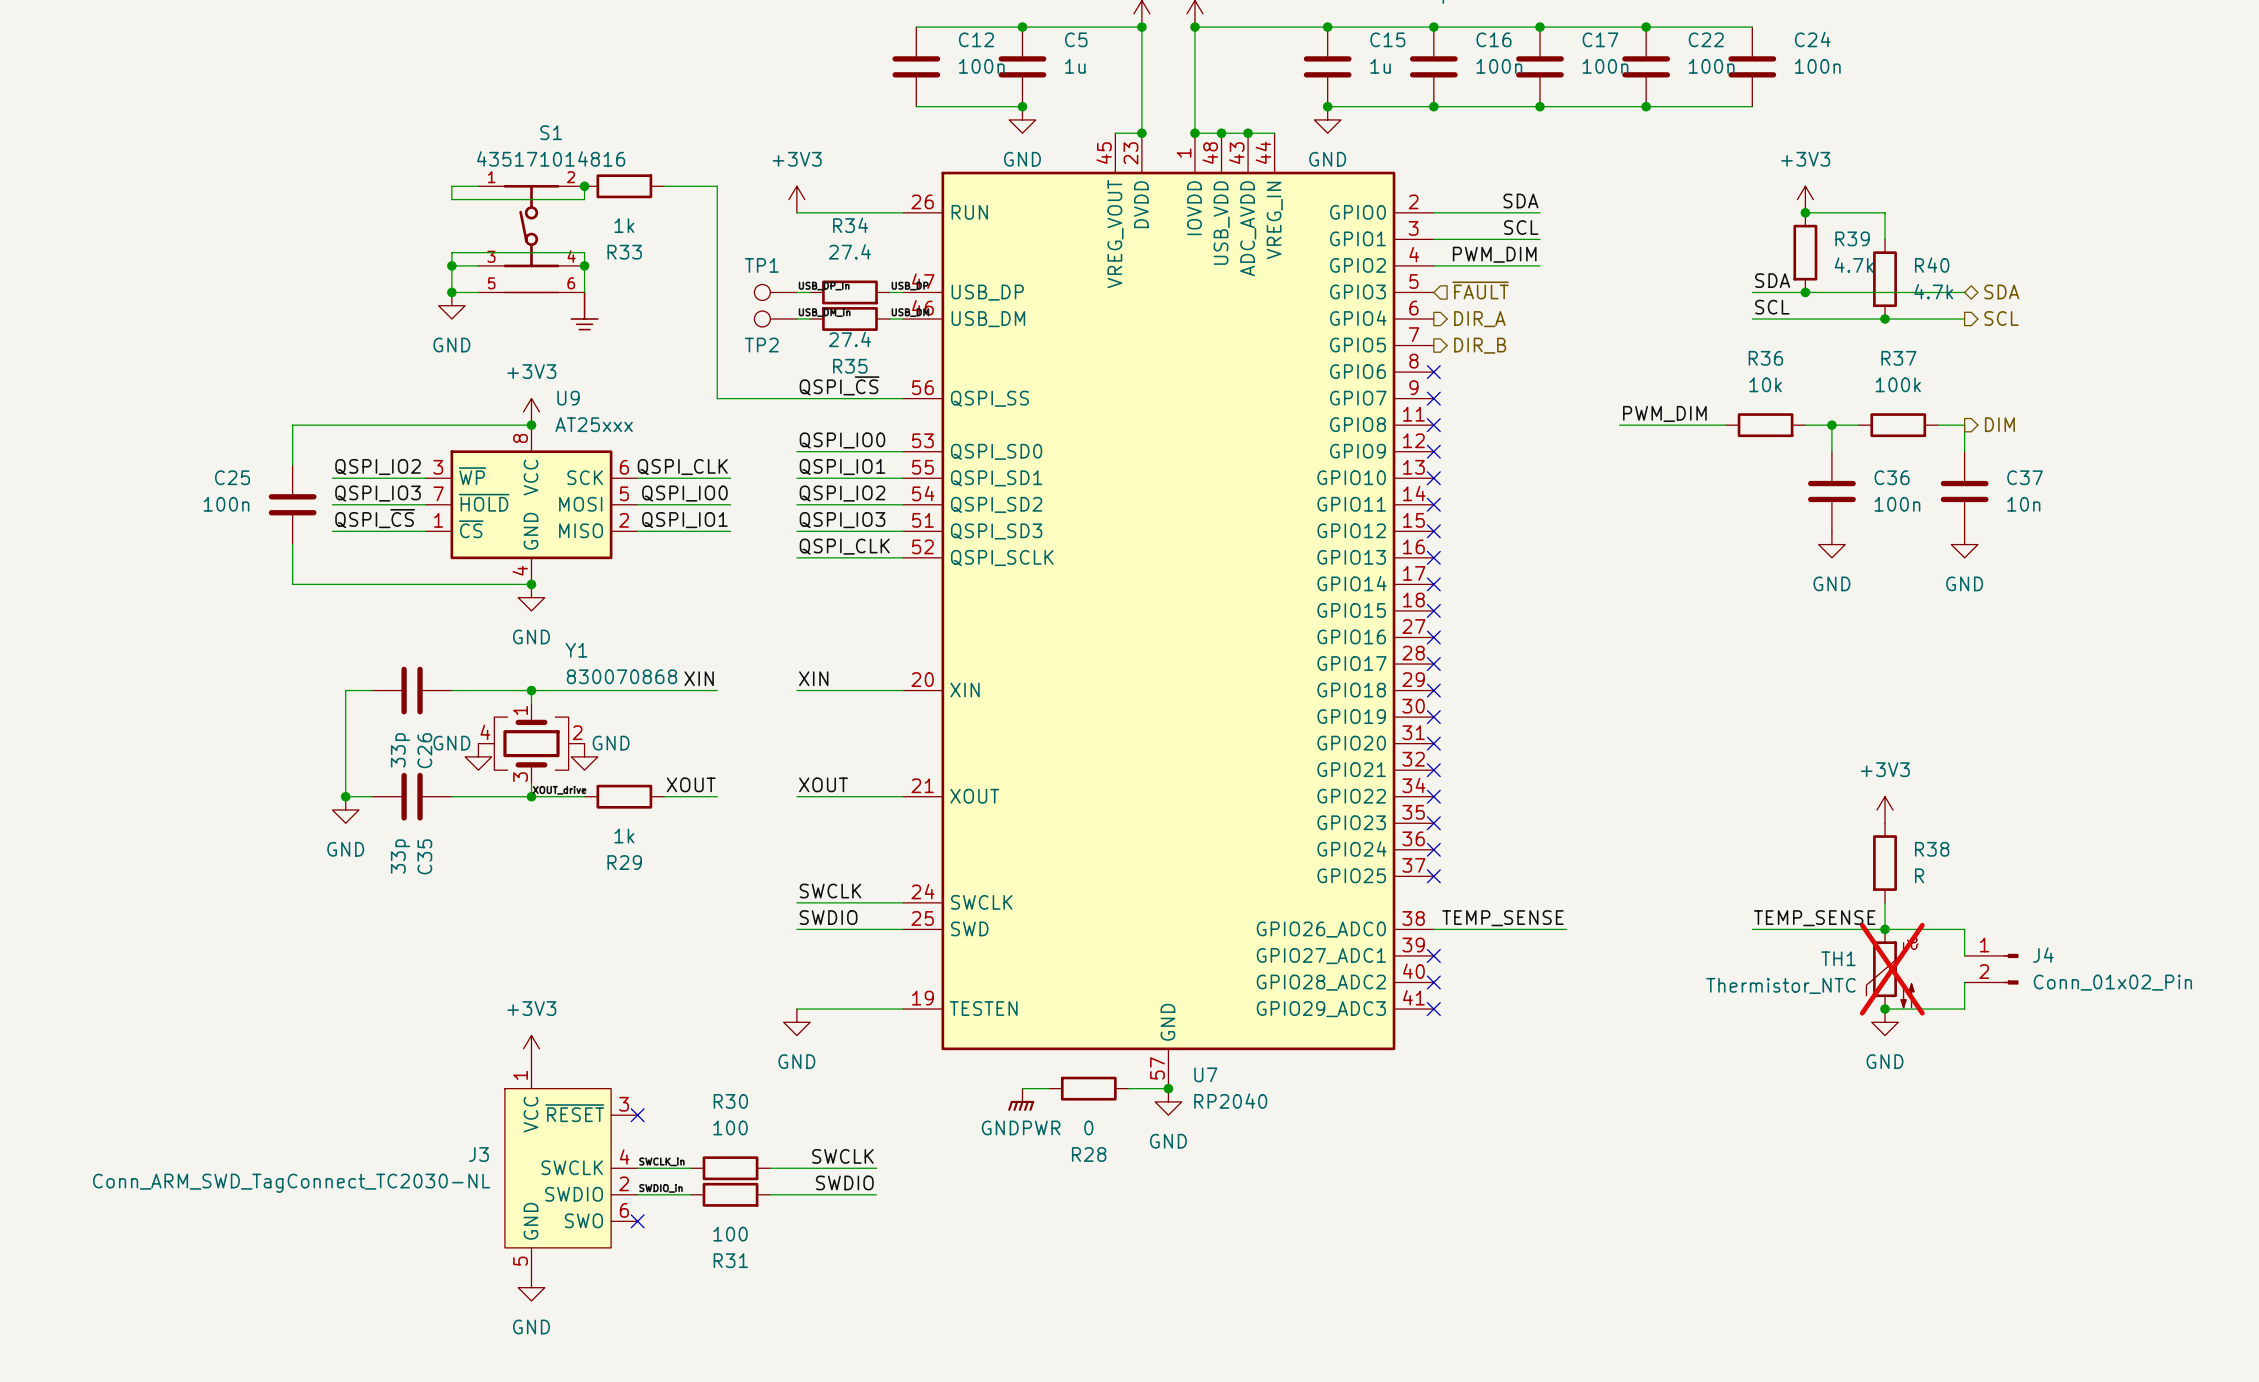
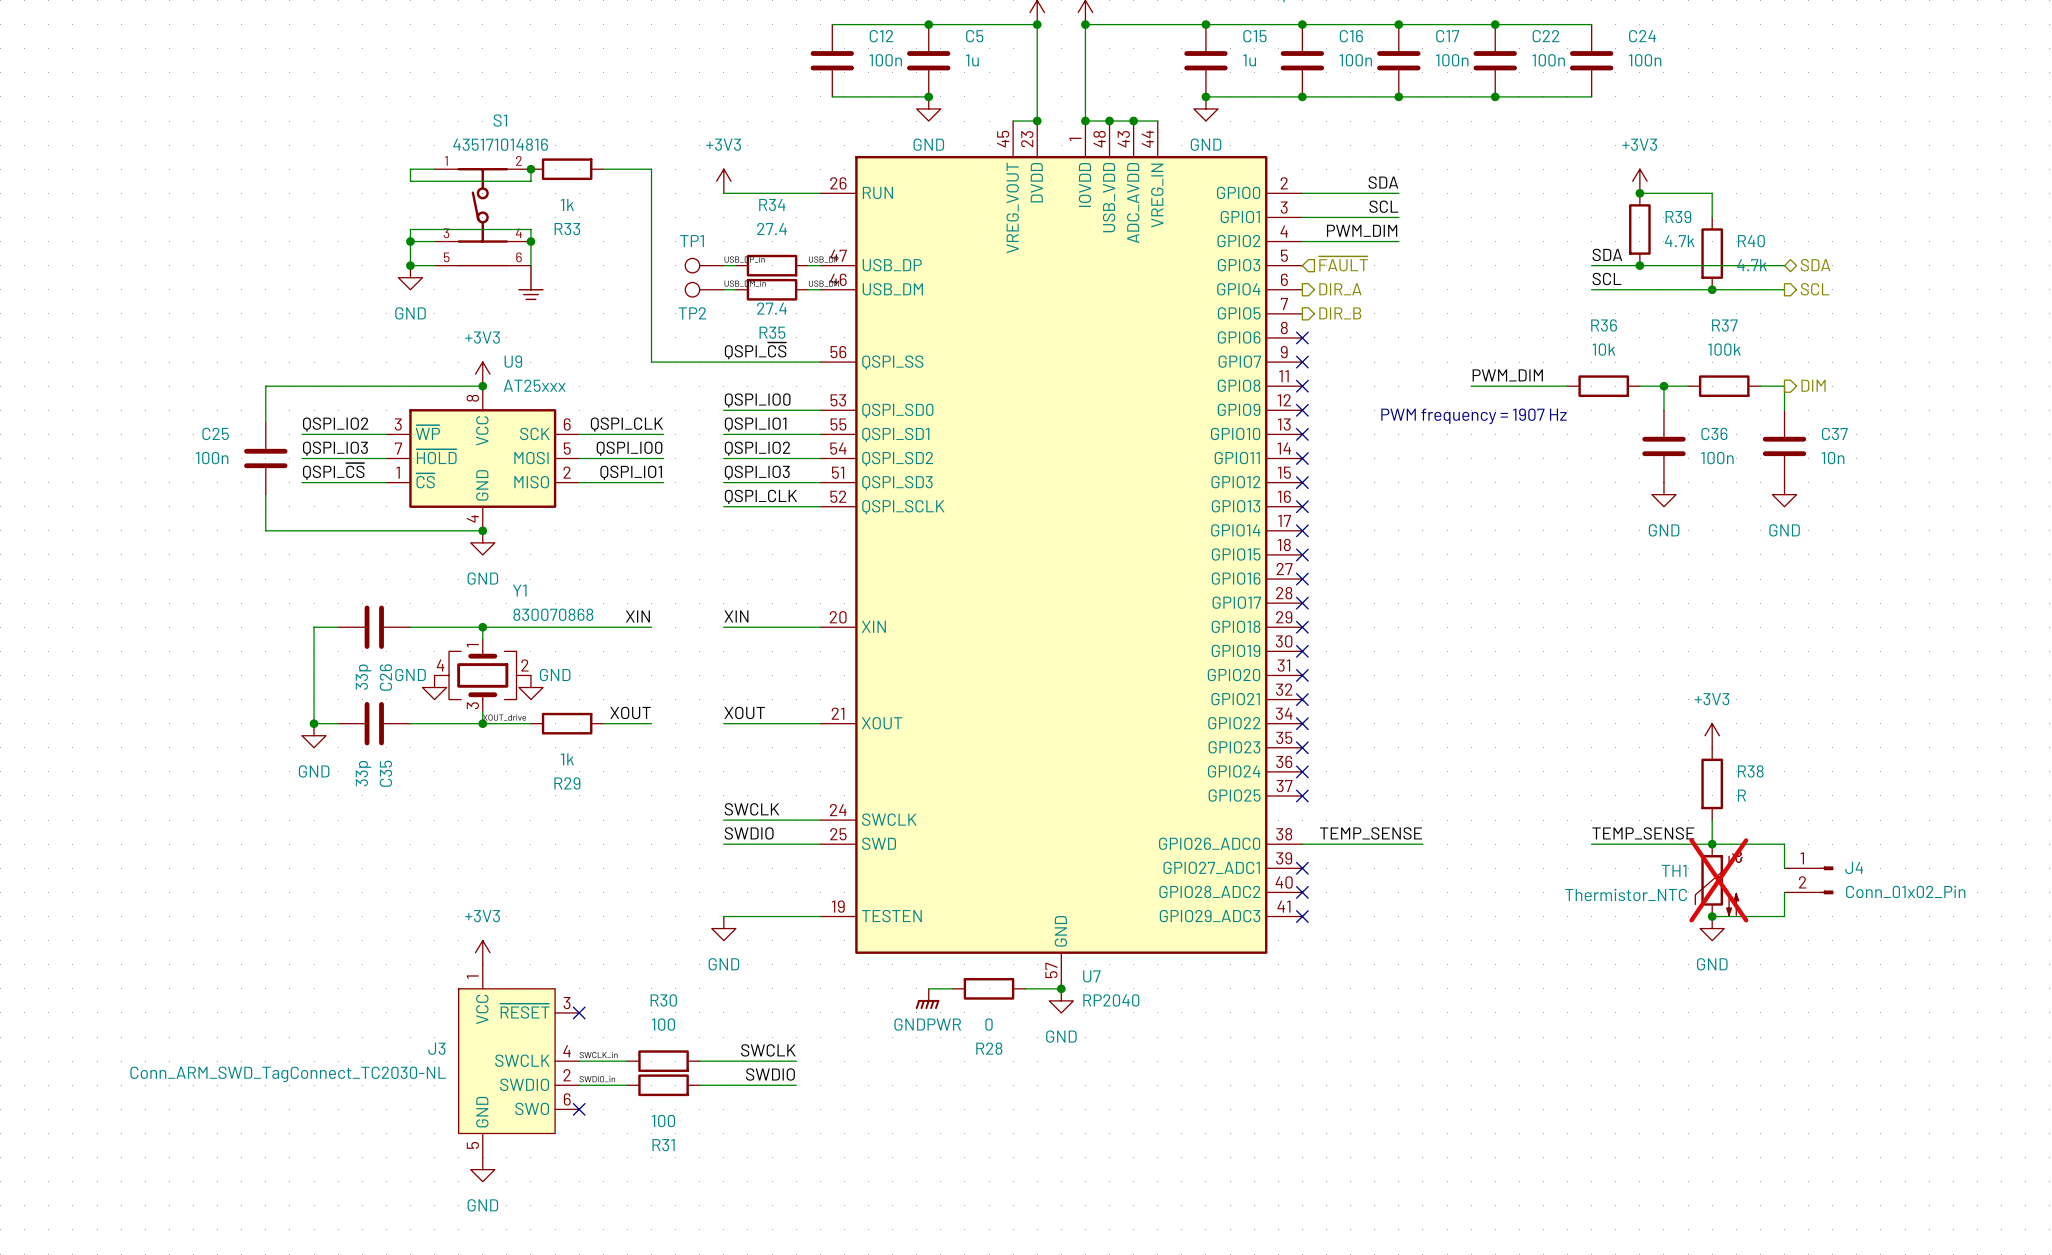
text: none -> PWM frequency = 1907 Hz (1473, 416)

